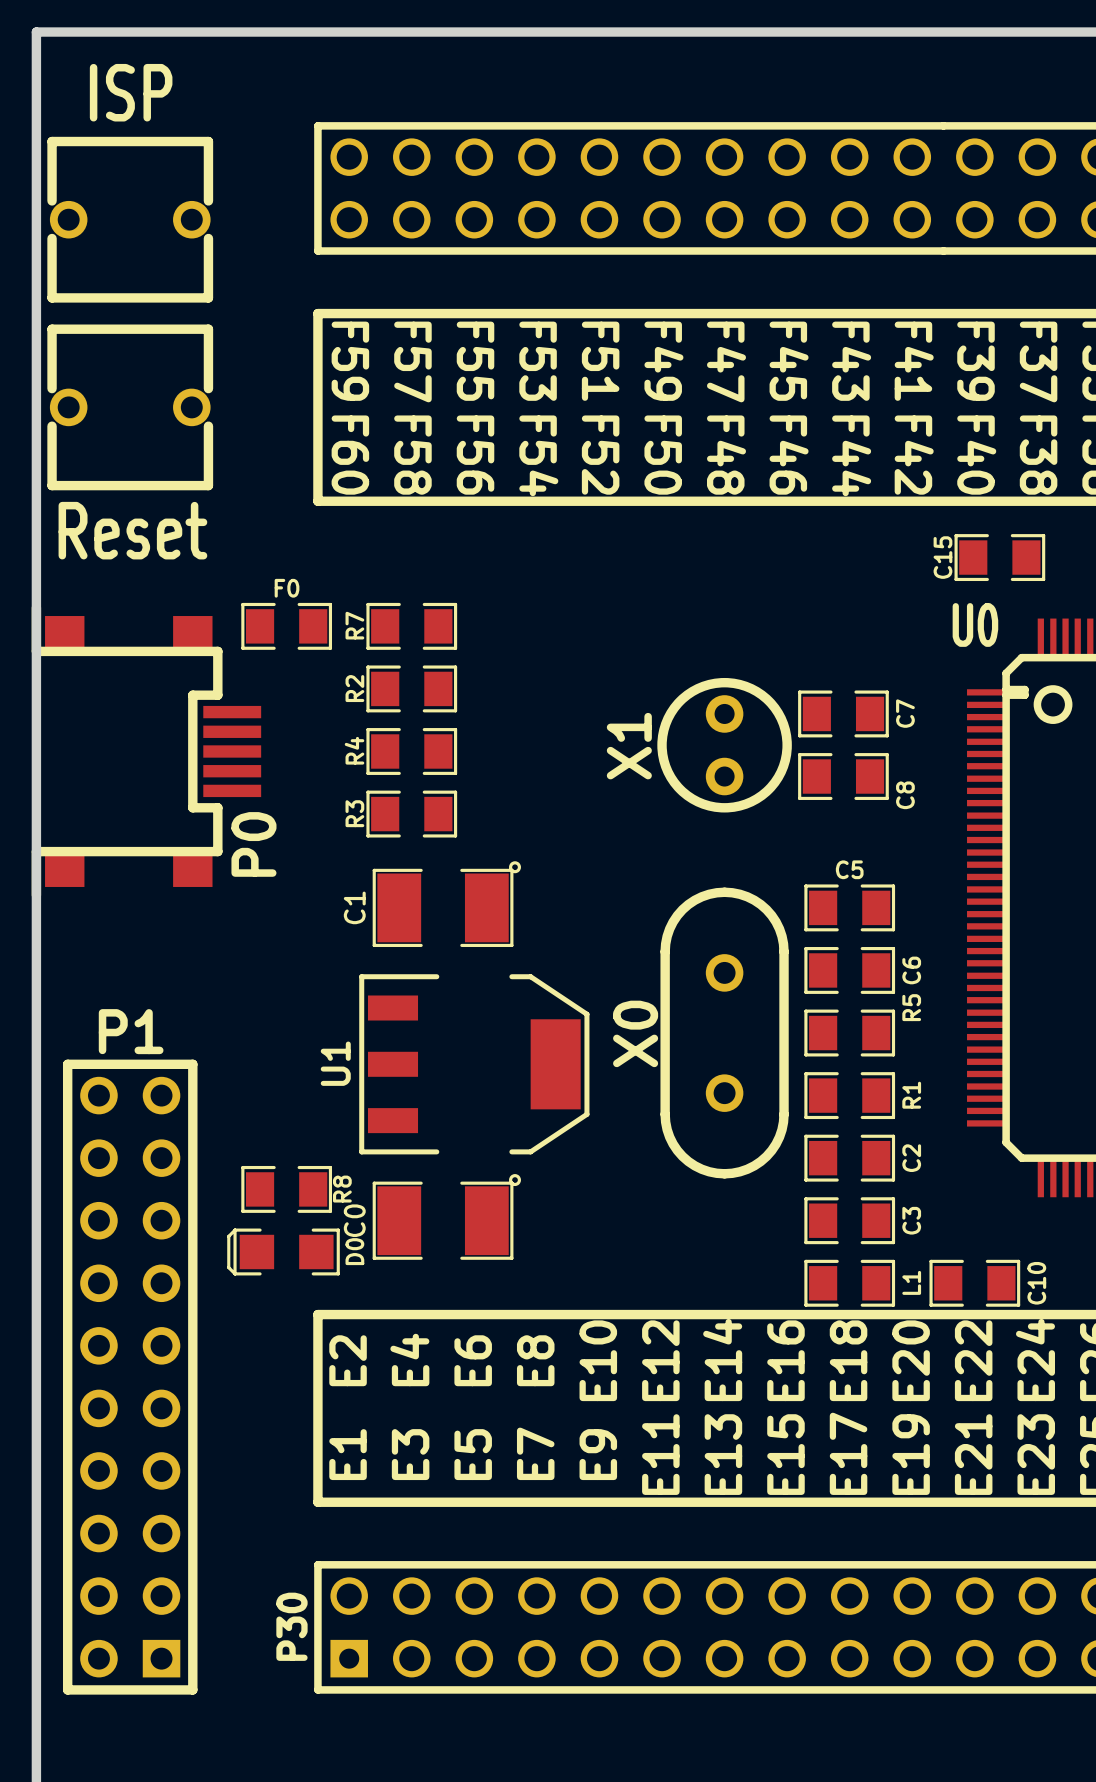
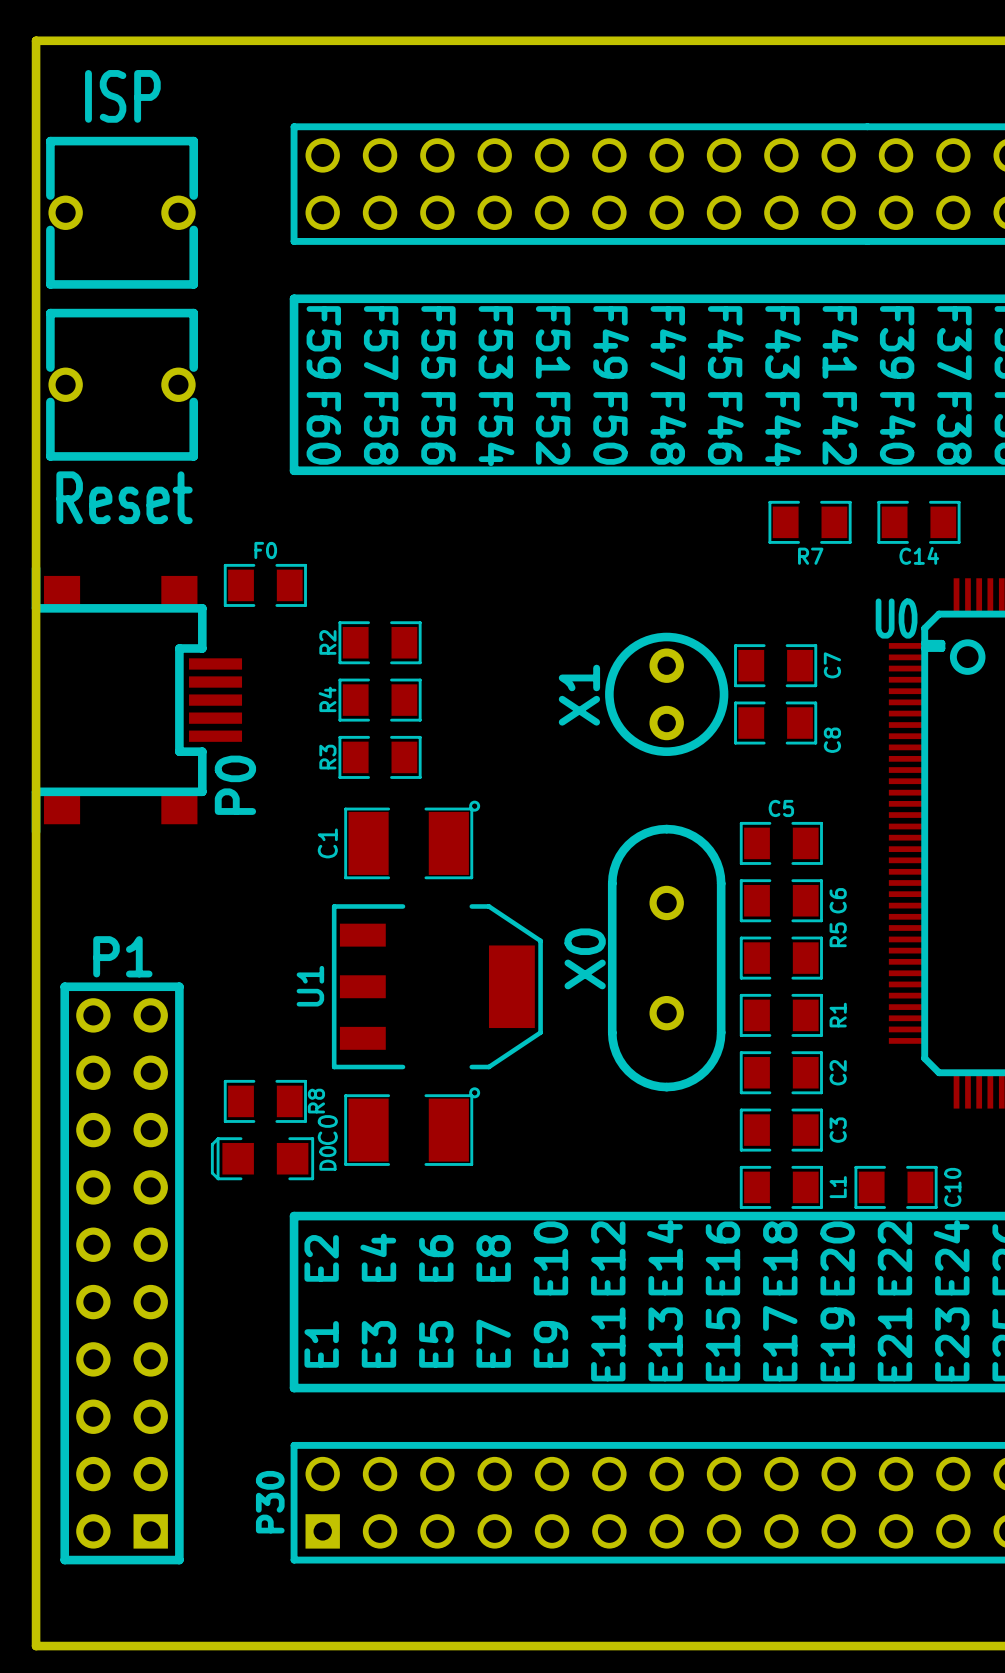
C15 name: C15 (942, 557) -> C14 (919, 555)
U0 name position: U0 (975, 624) -> U0 (896, 618)
R7 name rotation: 0° (354, 625) -> 90° clockwise (810, 556)
R7 name position: R7 (354, 625) -> R7 (810, 556)
R7 position: (411, 626) -> (810, 522)

